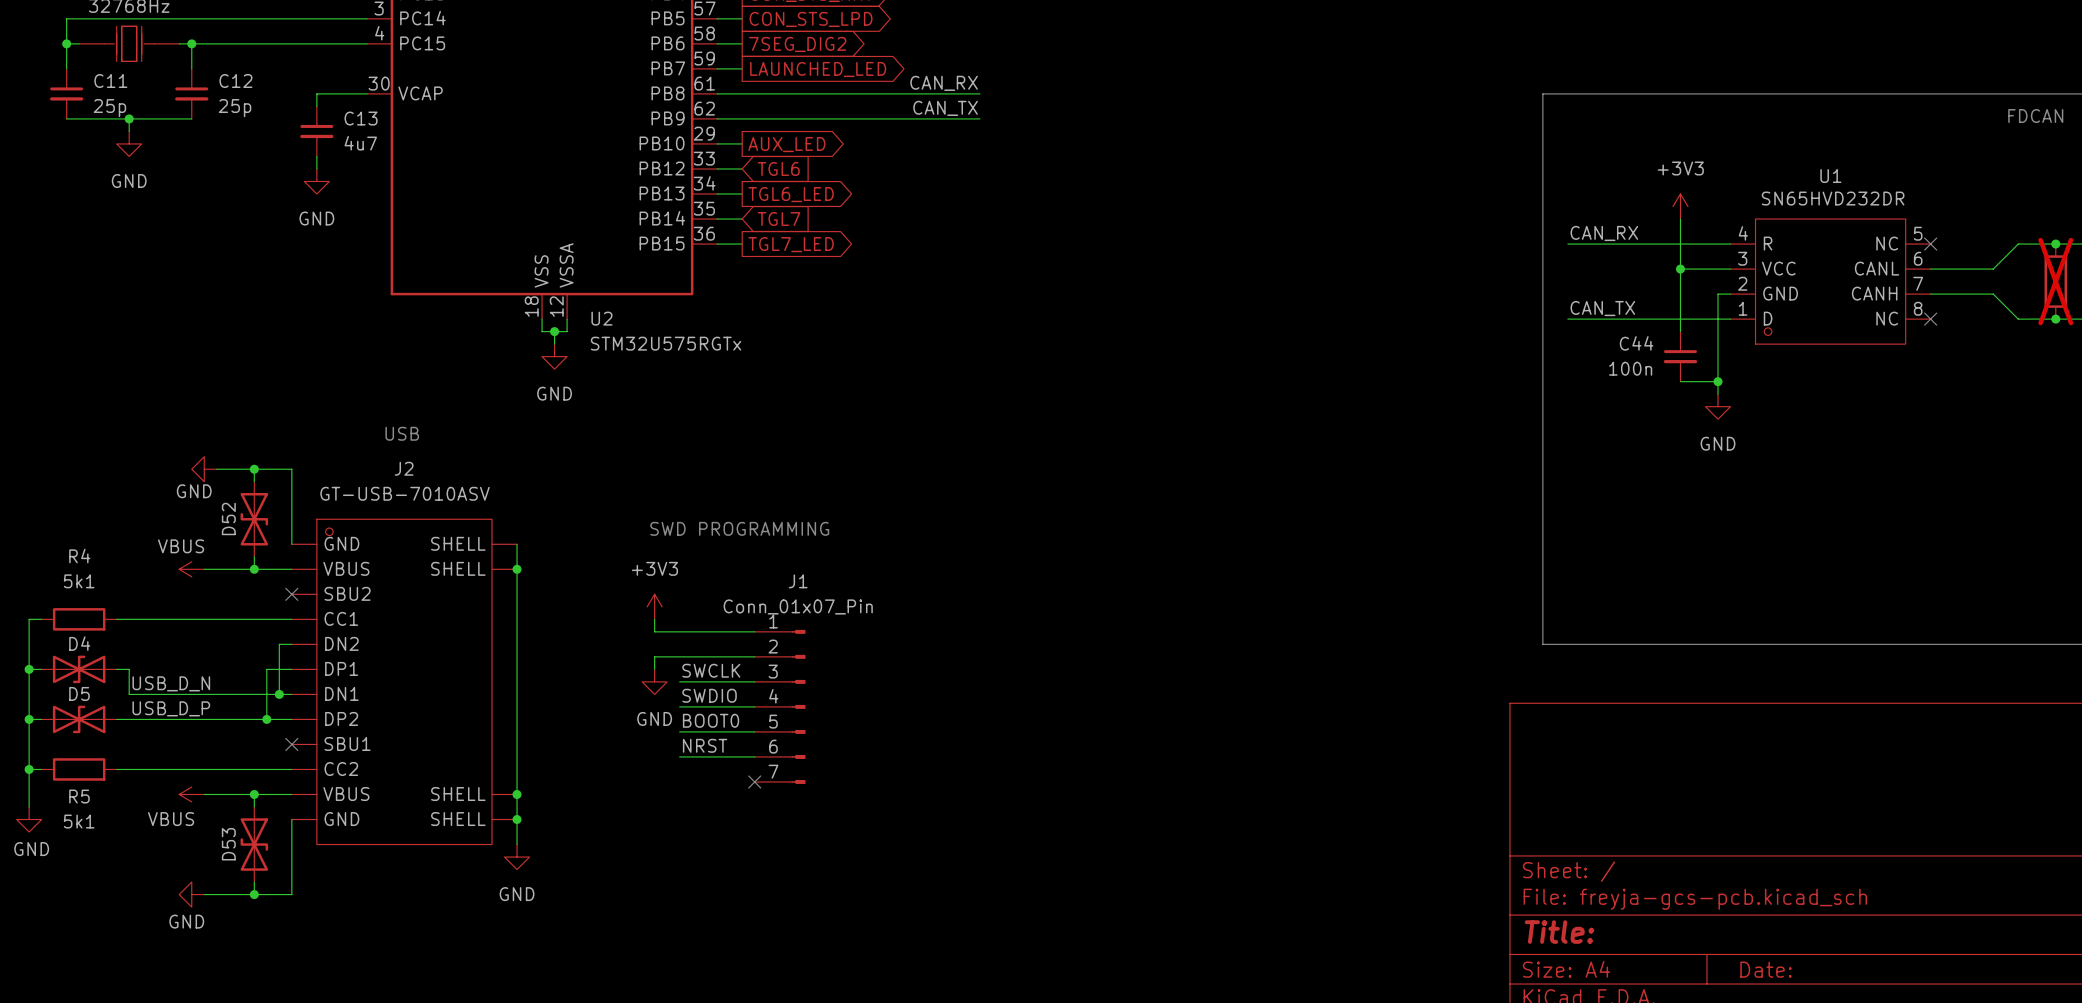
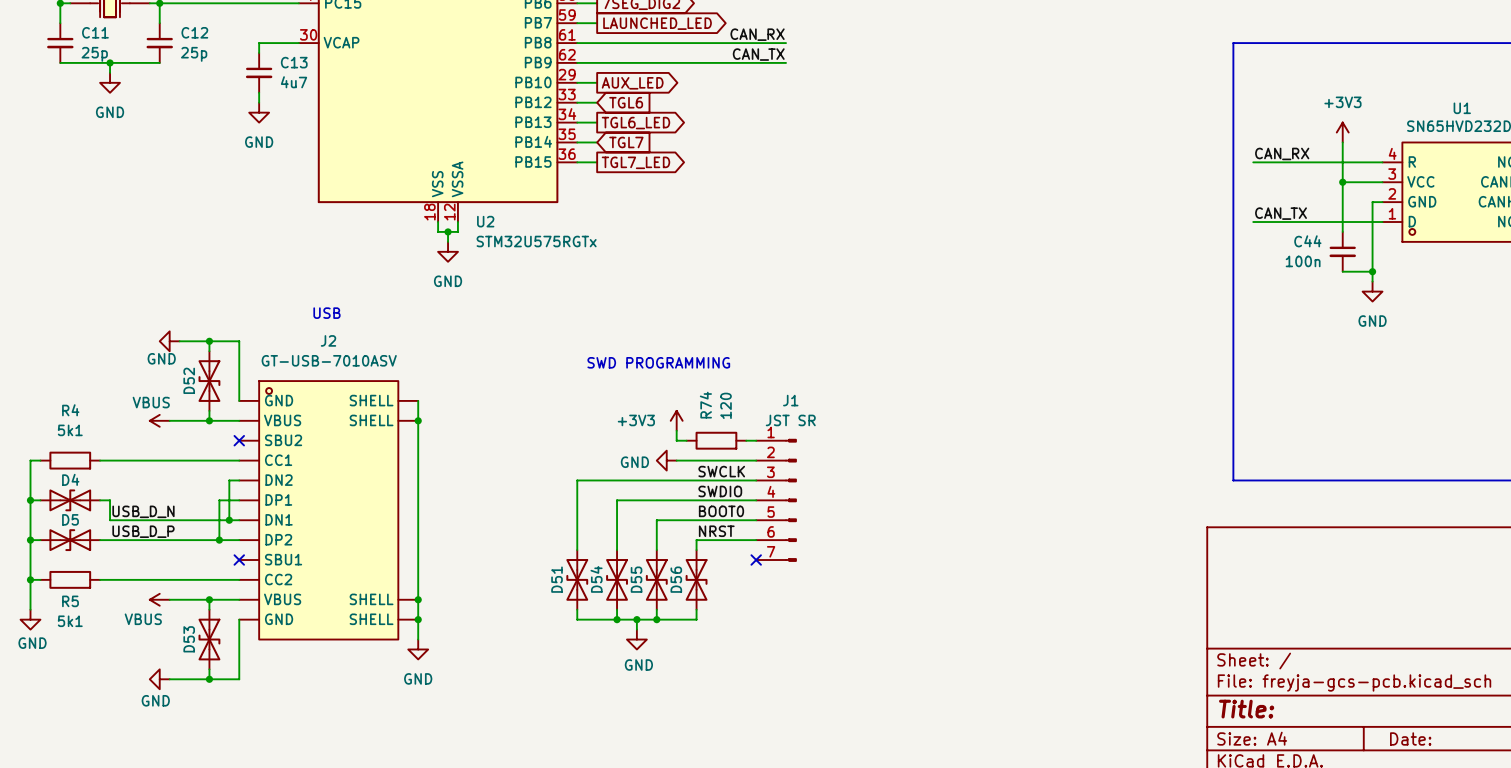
text position: SWD PROGRAMMING (739, 528) -> SWD PROGRAMMING (658, 362)
power symbol text position: +3V3 (654, 568) -> +3V3 (636, 420)
wire: none -> (676, 430) (676, 440) (686, 440)
R74: none -> 120 (716, 440)
wire: none -> (746, 440) (756, 440)
power symbol position: +3V3 (654, 606) -> +3V3 (676, 420)
J1 value: Conn_01x07_Pin (798, 606) -> JST SR (790, 420)
wire: (654, 619) (654, 631) (754, 631) -> none
power symbol: none -> GND (666, 460)
wire: none -> (676, 460) (756, 460)
wire: none -> (756, 480) (577, 480) (577, 550)
wire: (754, 656) (654, 656) (654, 669) -> none
wire: none -> (756, 500) (617, 500) (617, 550)
label position: SWCLK (711, 670) -> SWCLK (721, 471)
power symbol: GND (654, 681) -> none
wire: (679, 681) (754, 681) -> none
wire: none -> (756, 520) (656, 520) (656, 550)
label position: SWDIO (709, 695) -> SWDIO (720, 491)
wire: (679, 706) (754, 706) -> none
J1 position: (780, 706) -> (776, 500)
wire: none -> (756, 540) (696, 540) (696, 550)
label position: BOOT0 (711, 720) -> BOOT0 (721, 511)
wire: (679, 731) (754, 731) -> none
no-connect mark: none -> (756, 560)
label position: NRST (705, 745) -> NRST (716, 531)
wire: (679, 756) (754, 756) -> none
D51: none -> (577, 579)
D54: none -> (617, 579)
D55: none -> (656, 579)
D56: none -> (696, 579)
no-connect mark: (754, 781) -> none
wire: none -> (577, 609) (577, 619) (696, 619) (696, 609)
wire: none -> (617, 609) (617, 619)
wire: none -> (656, 609) (656, 619)
junction: none -> (617, 619)
wire: none -> (636, 619) (636, 629)
junction: none -> (636, 619)
junction: none -> (656, 619)
power symbol: none -> GND (636, 639)

